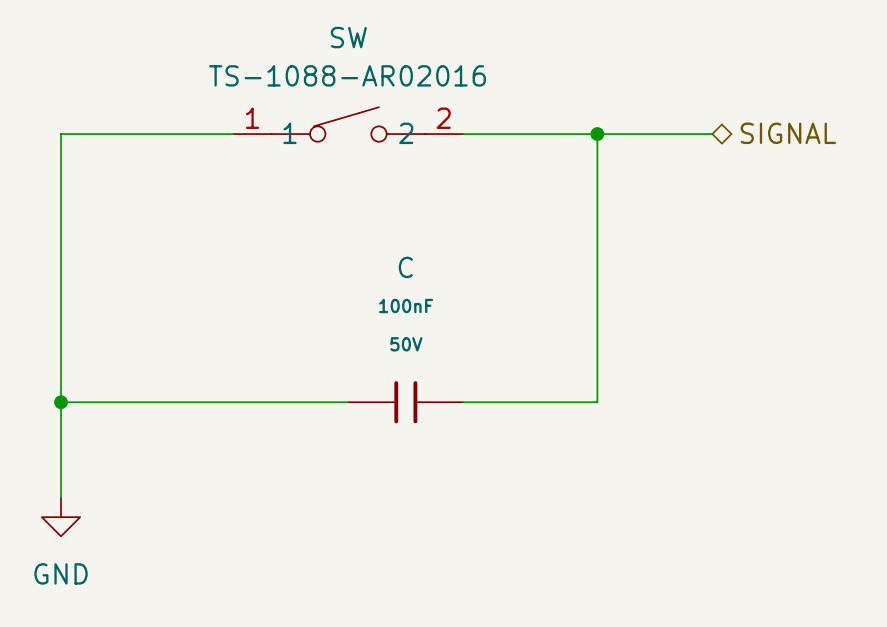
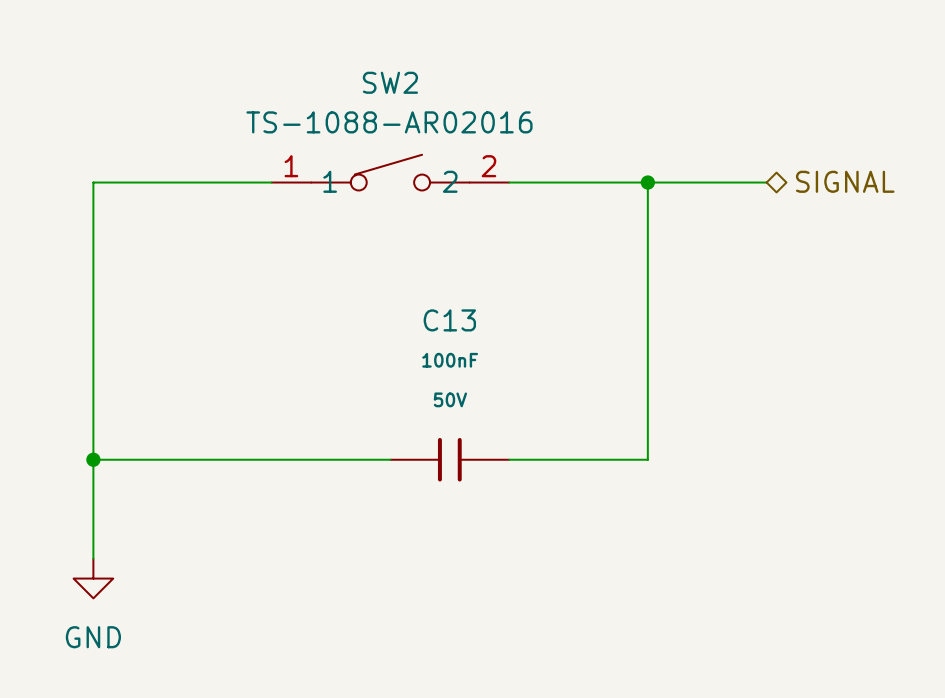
SW name: SW (348, 37) -> SW2 (390, 82)
C name: C (405, 267) -> C13 (449, 320)

